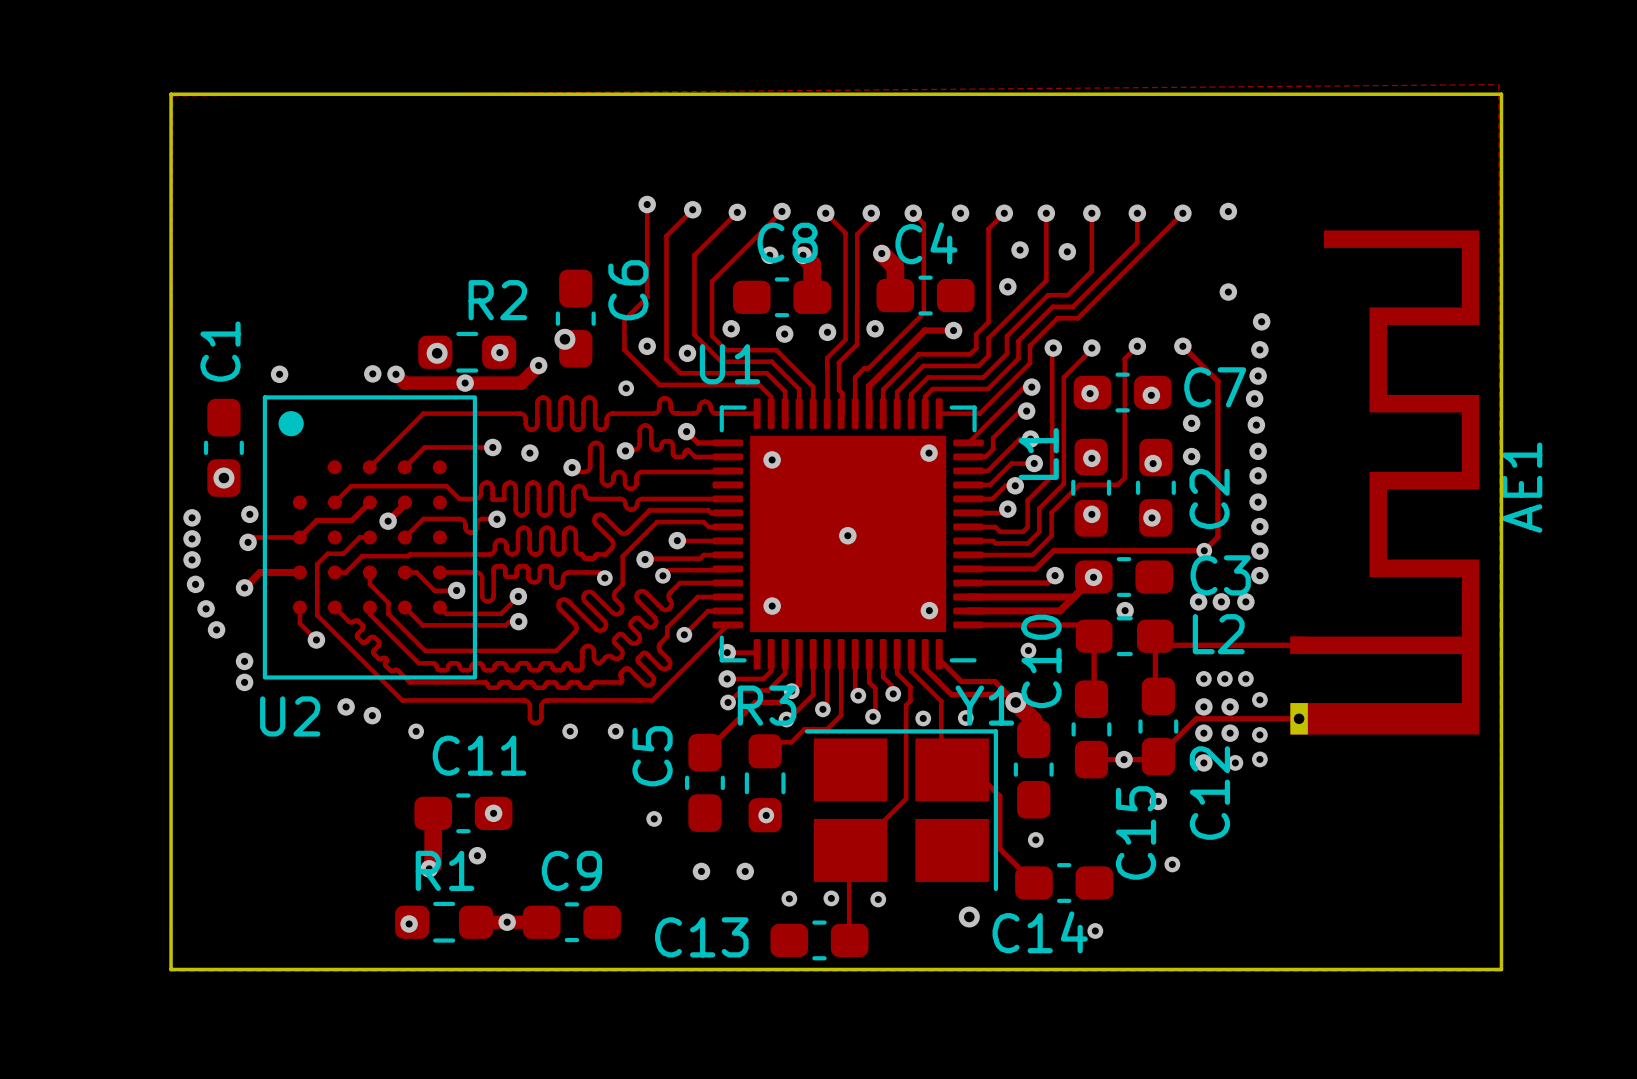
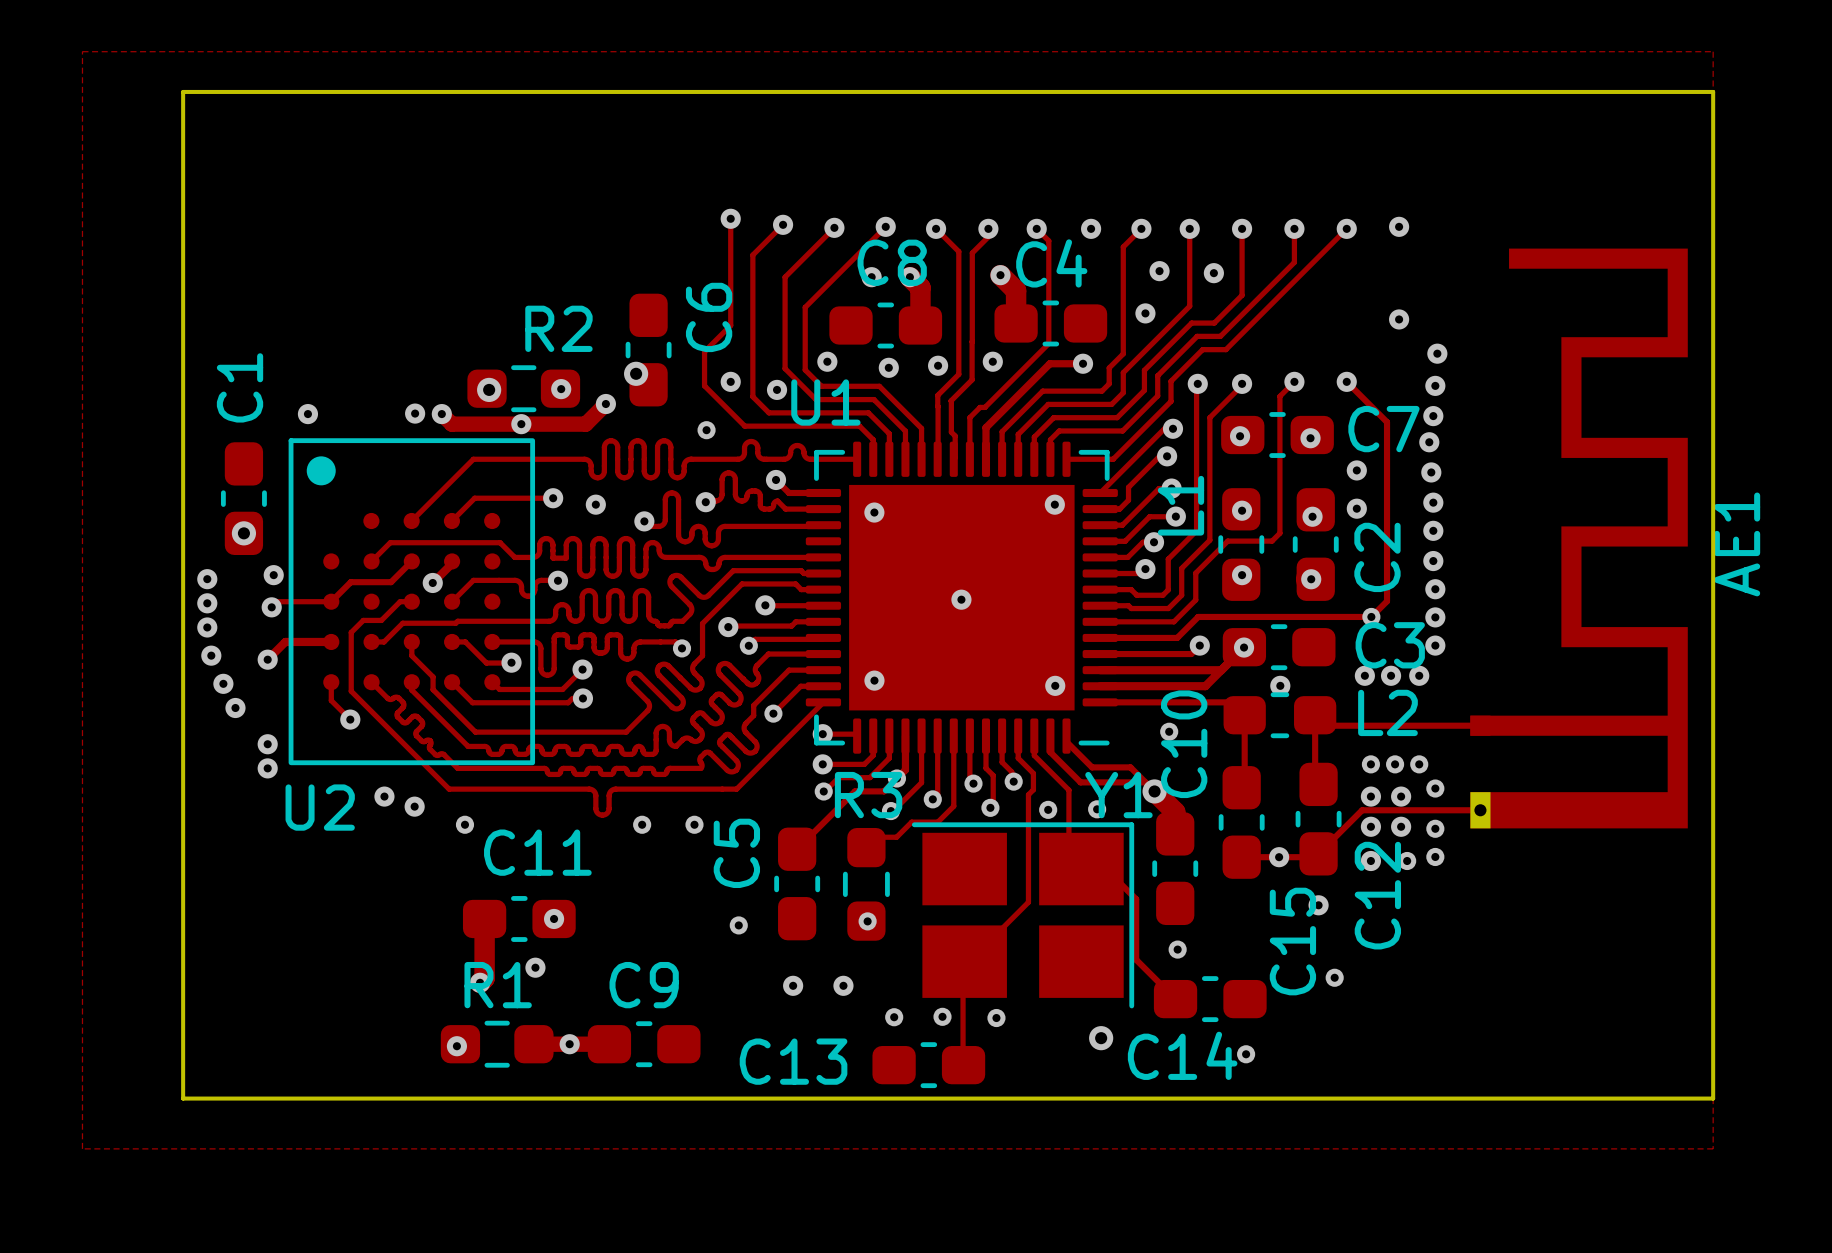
zone outline: (1498, 84) (172, 95) (170, 971) (1500, 971) (1498, 84) -> (82, 51) (82, 1148) (1713, 1148) (1713, 51) (82, 51)

